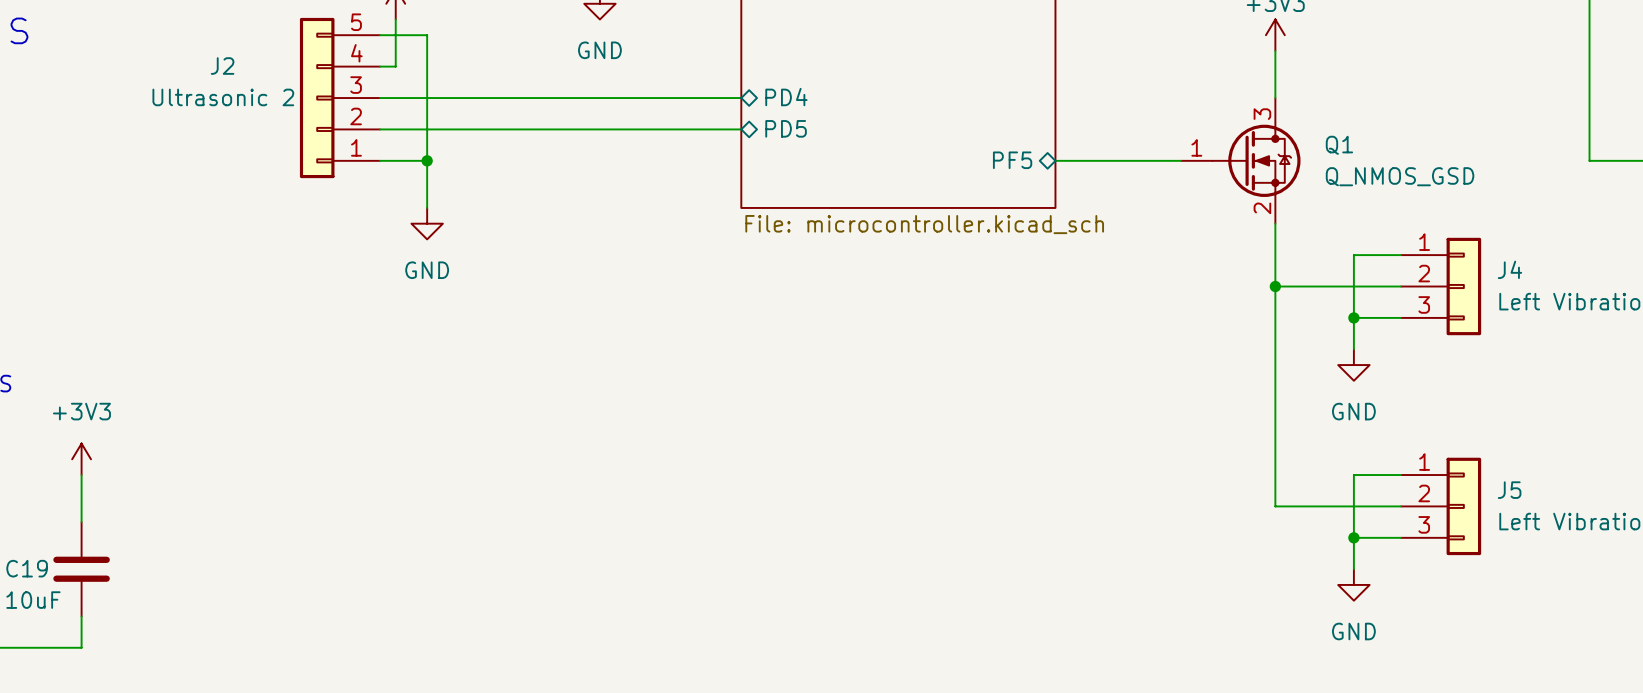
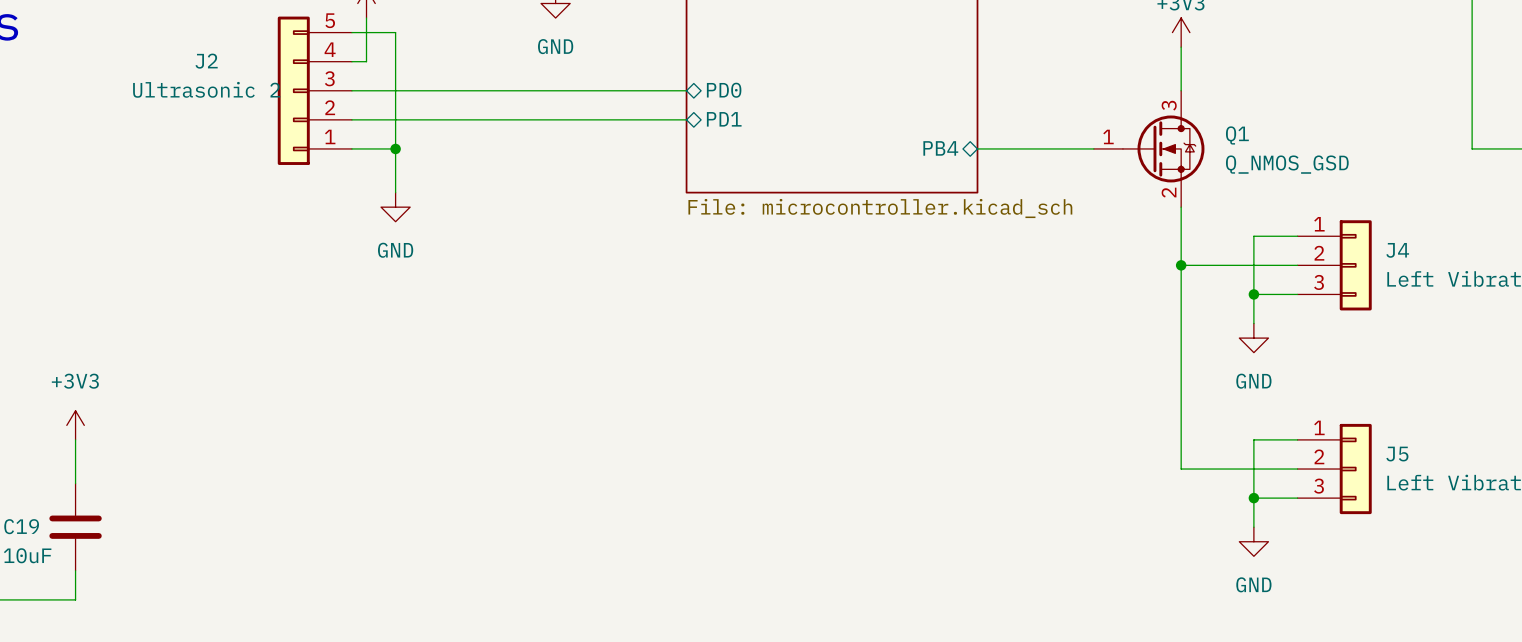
sheet pin: PD4 (786, 97) -> PD0 (724, 90)
sheet pin: PD5 (786, 128) -> PD1 (724, 119)
sheet pin: PF5 (1012, 160) -> PB4 (940, 148)

